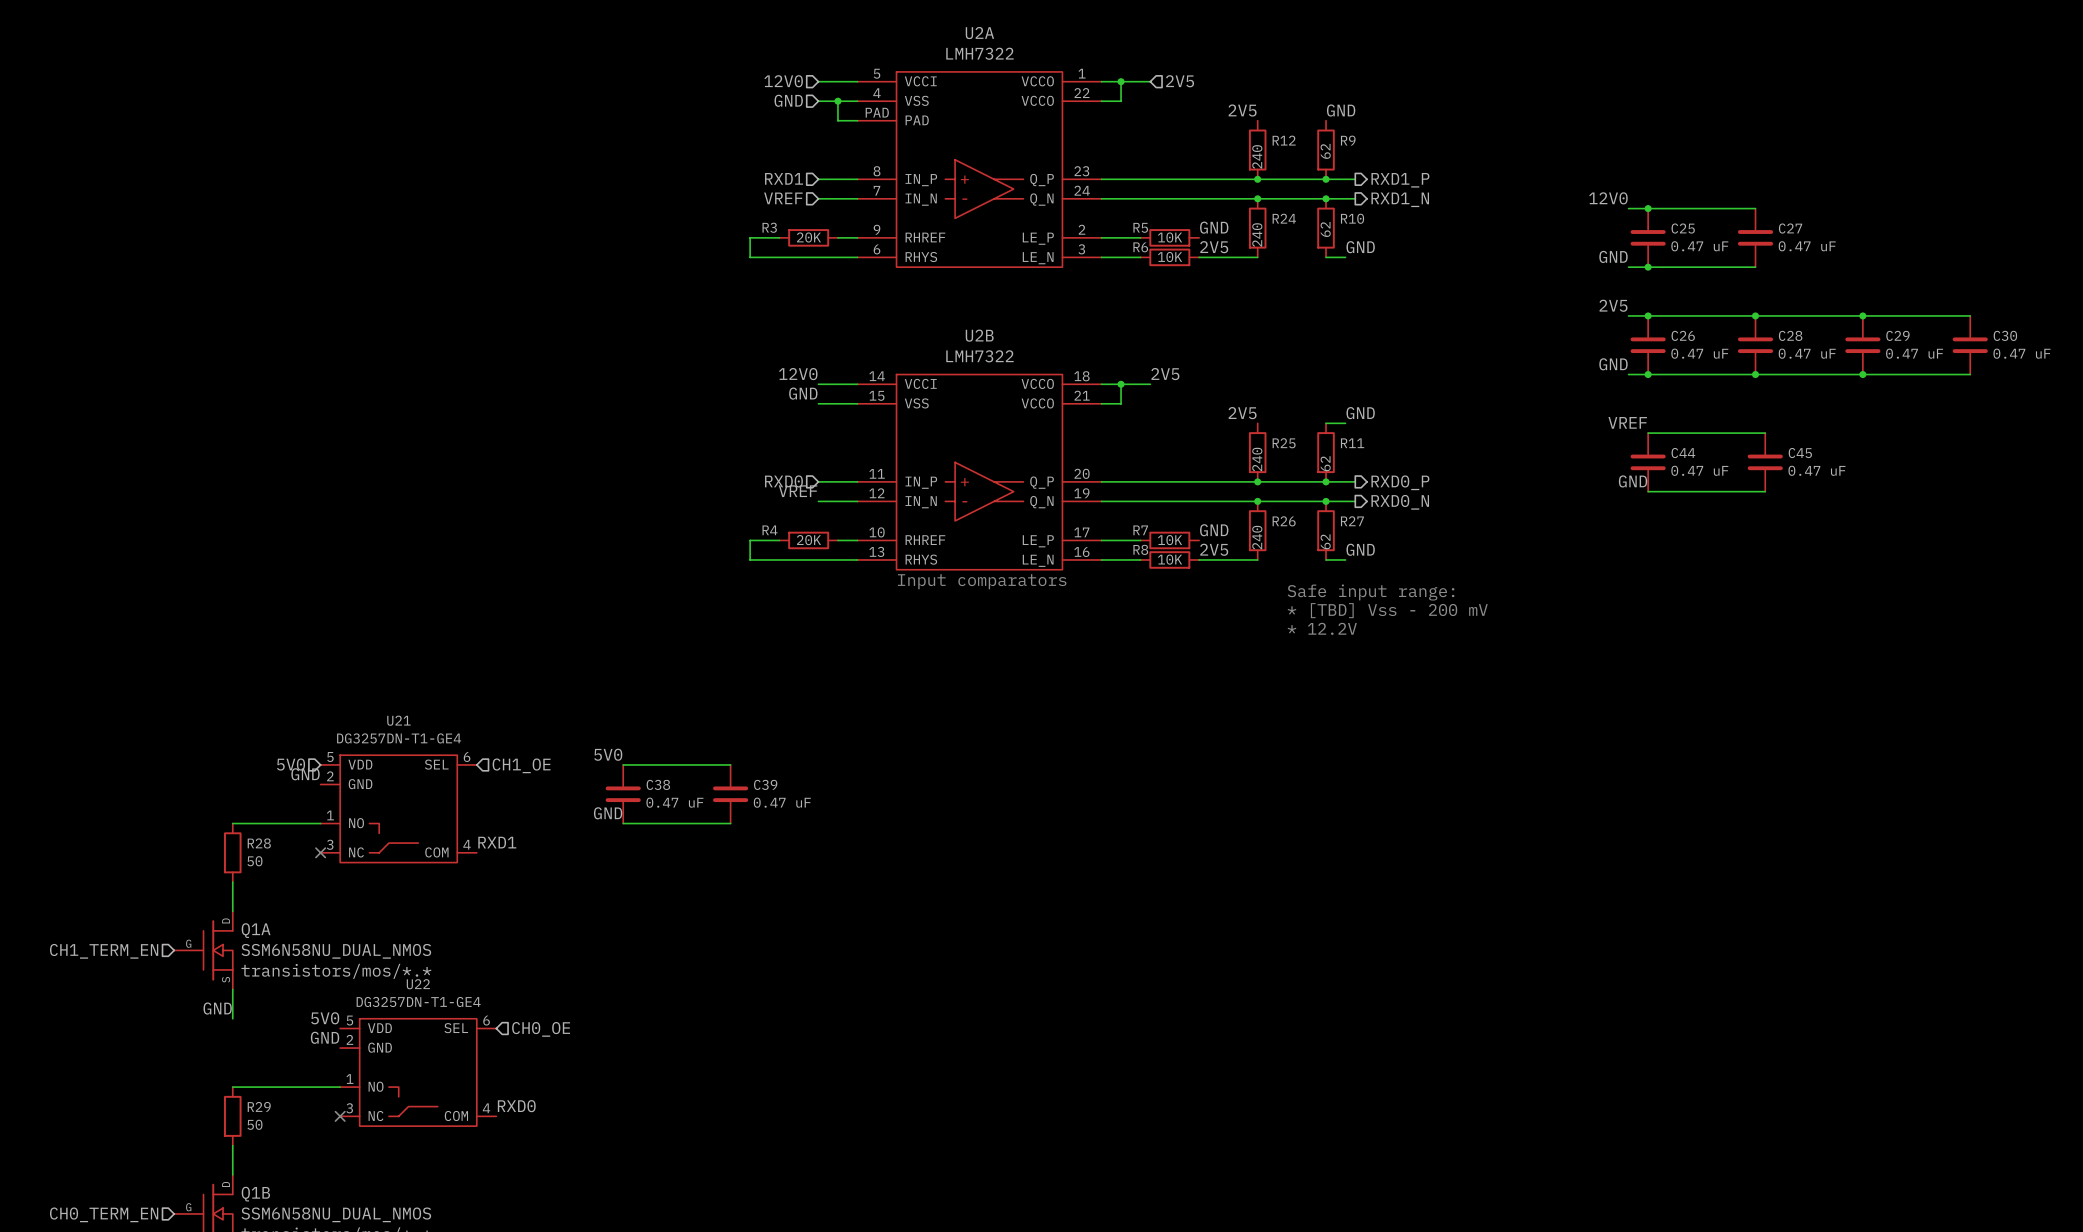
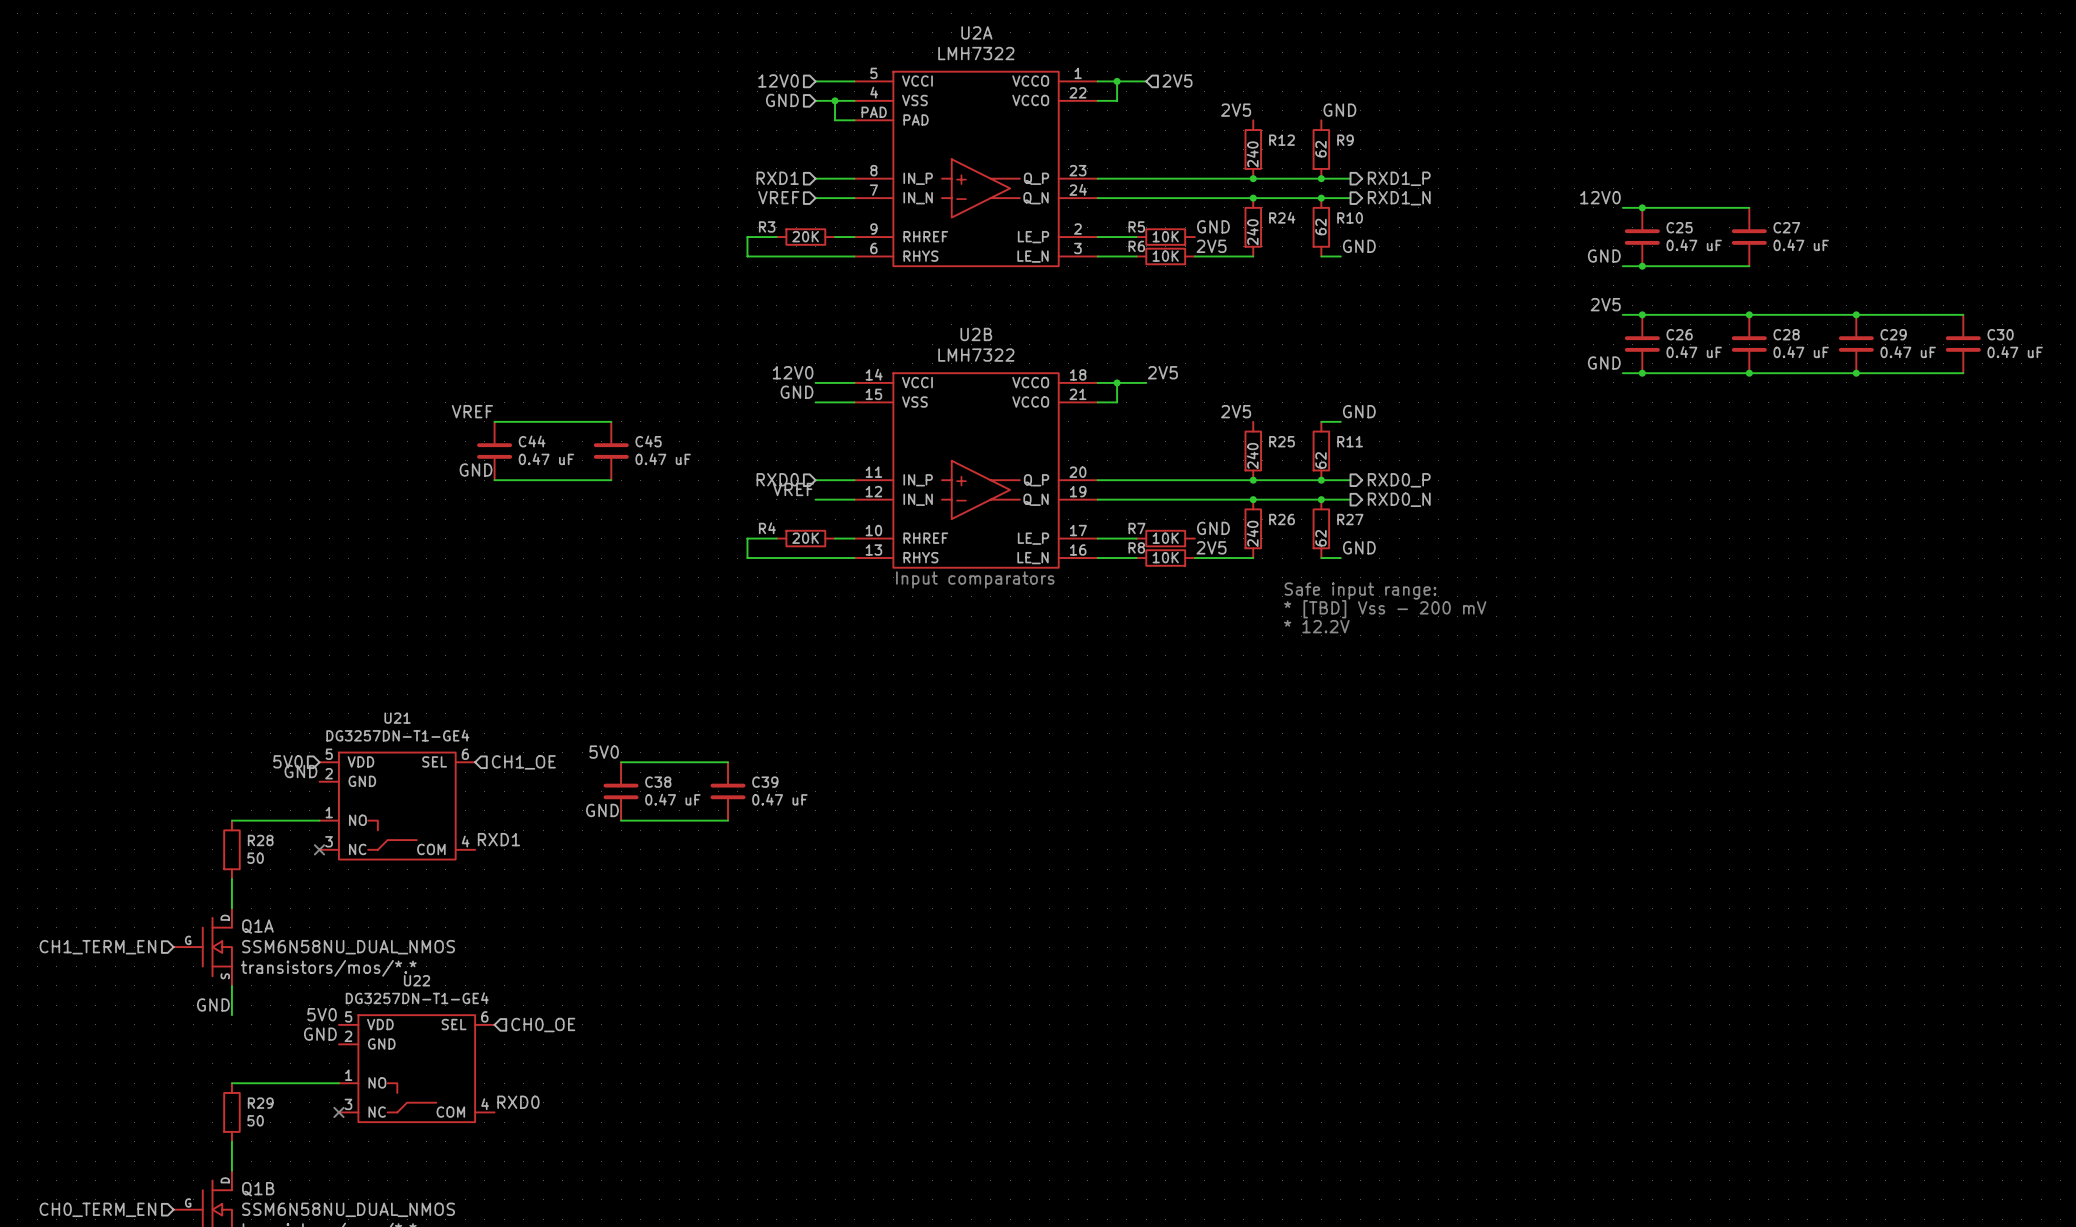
label: none -> VREF (472, 411)
label: VREF (1627, 422) -> none
wire: none -> (494, 421) (611, 421)
wire: (1648, 433) (1765, 433) -> none
C44 position: (1648, 462) -> (494, 451)
C45 position: (1765, 462) -> (611, 451)
label: none -> GND (476, 470)
wire: none -> (494, 480) (611, 480)
label: GND (1633, 481) -> none
wire: (1648, 491) (1765, 491) -> none

